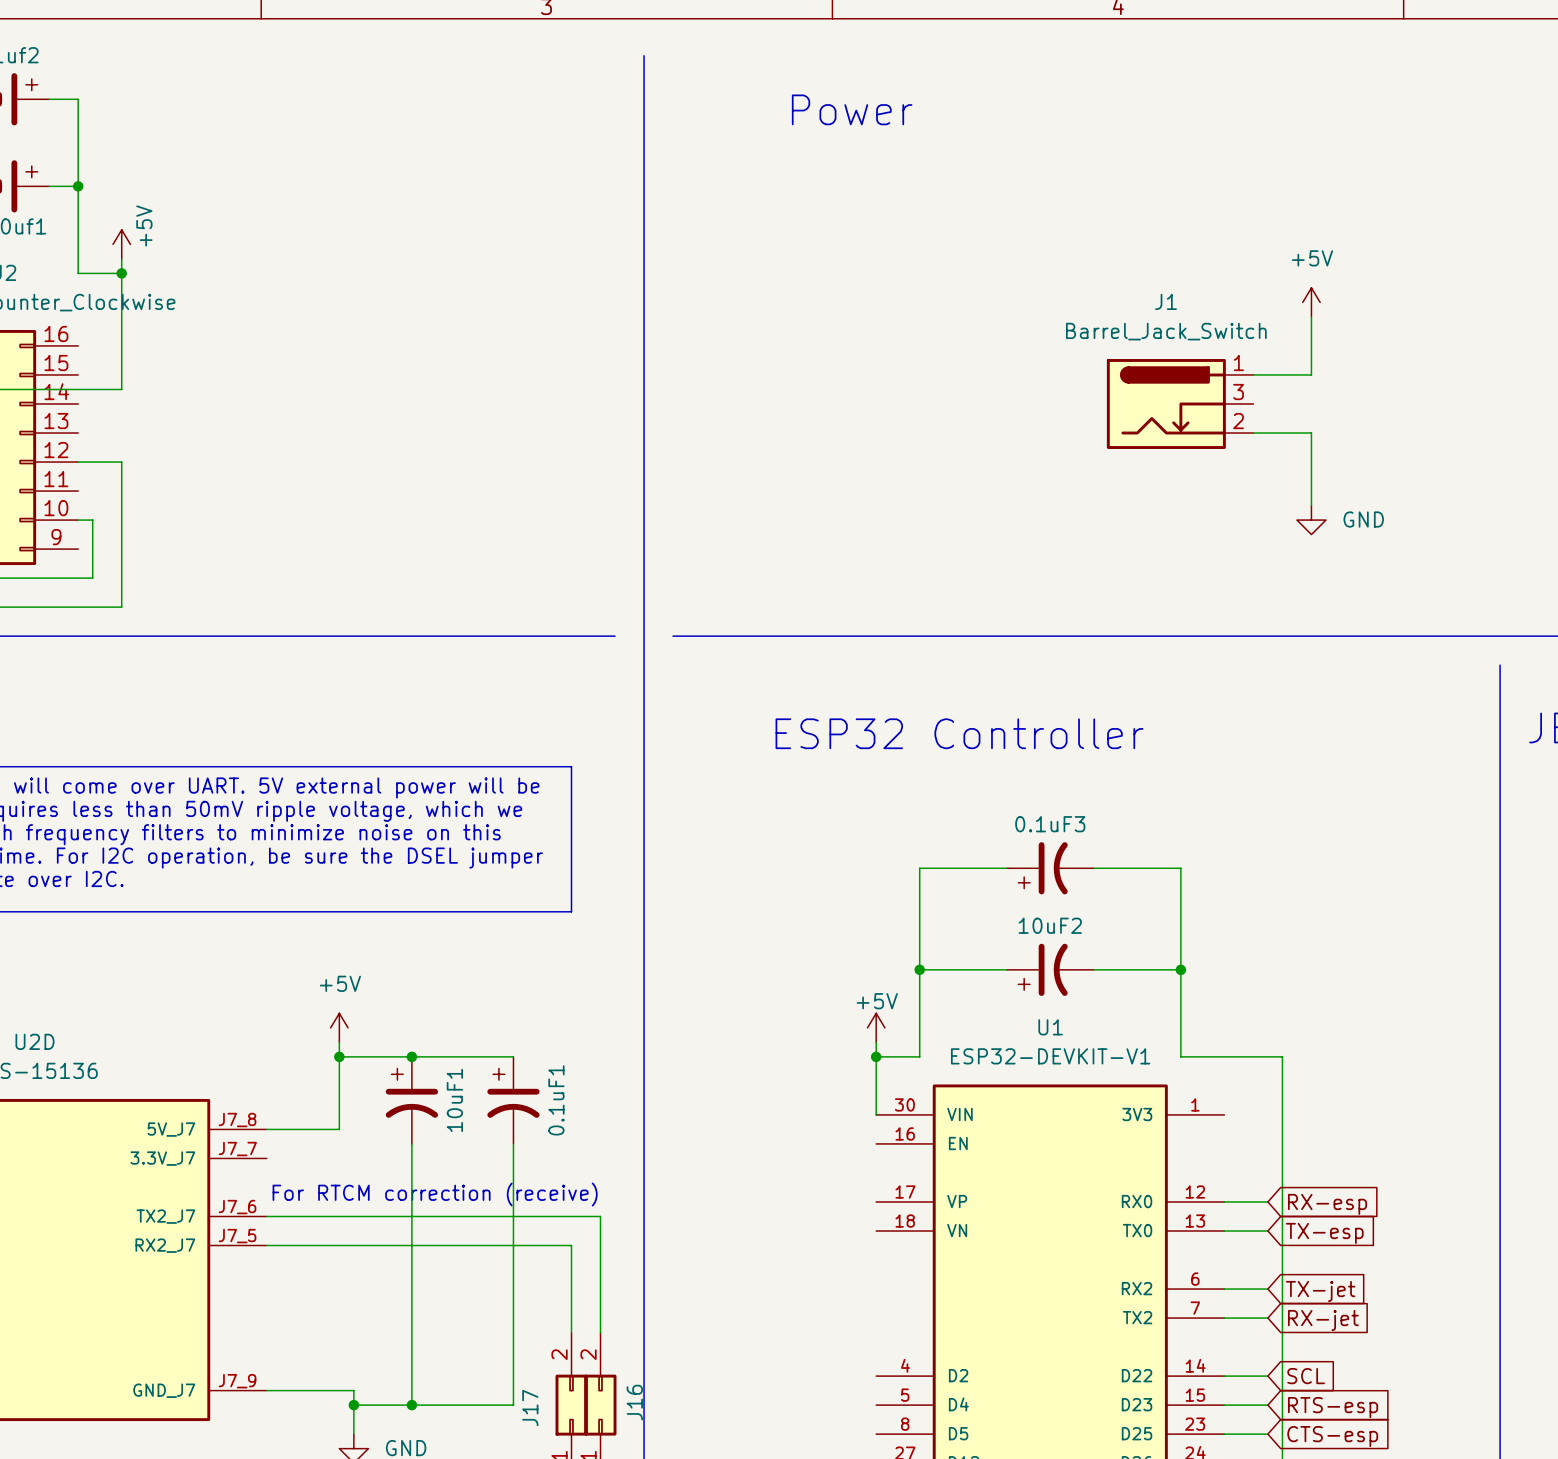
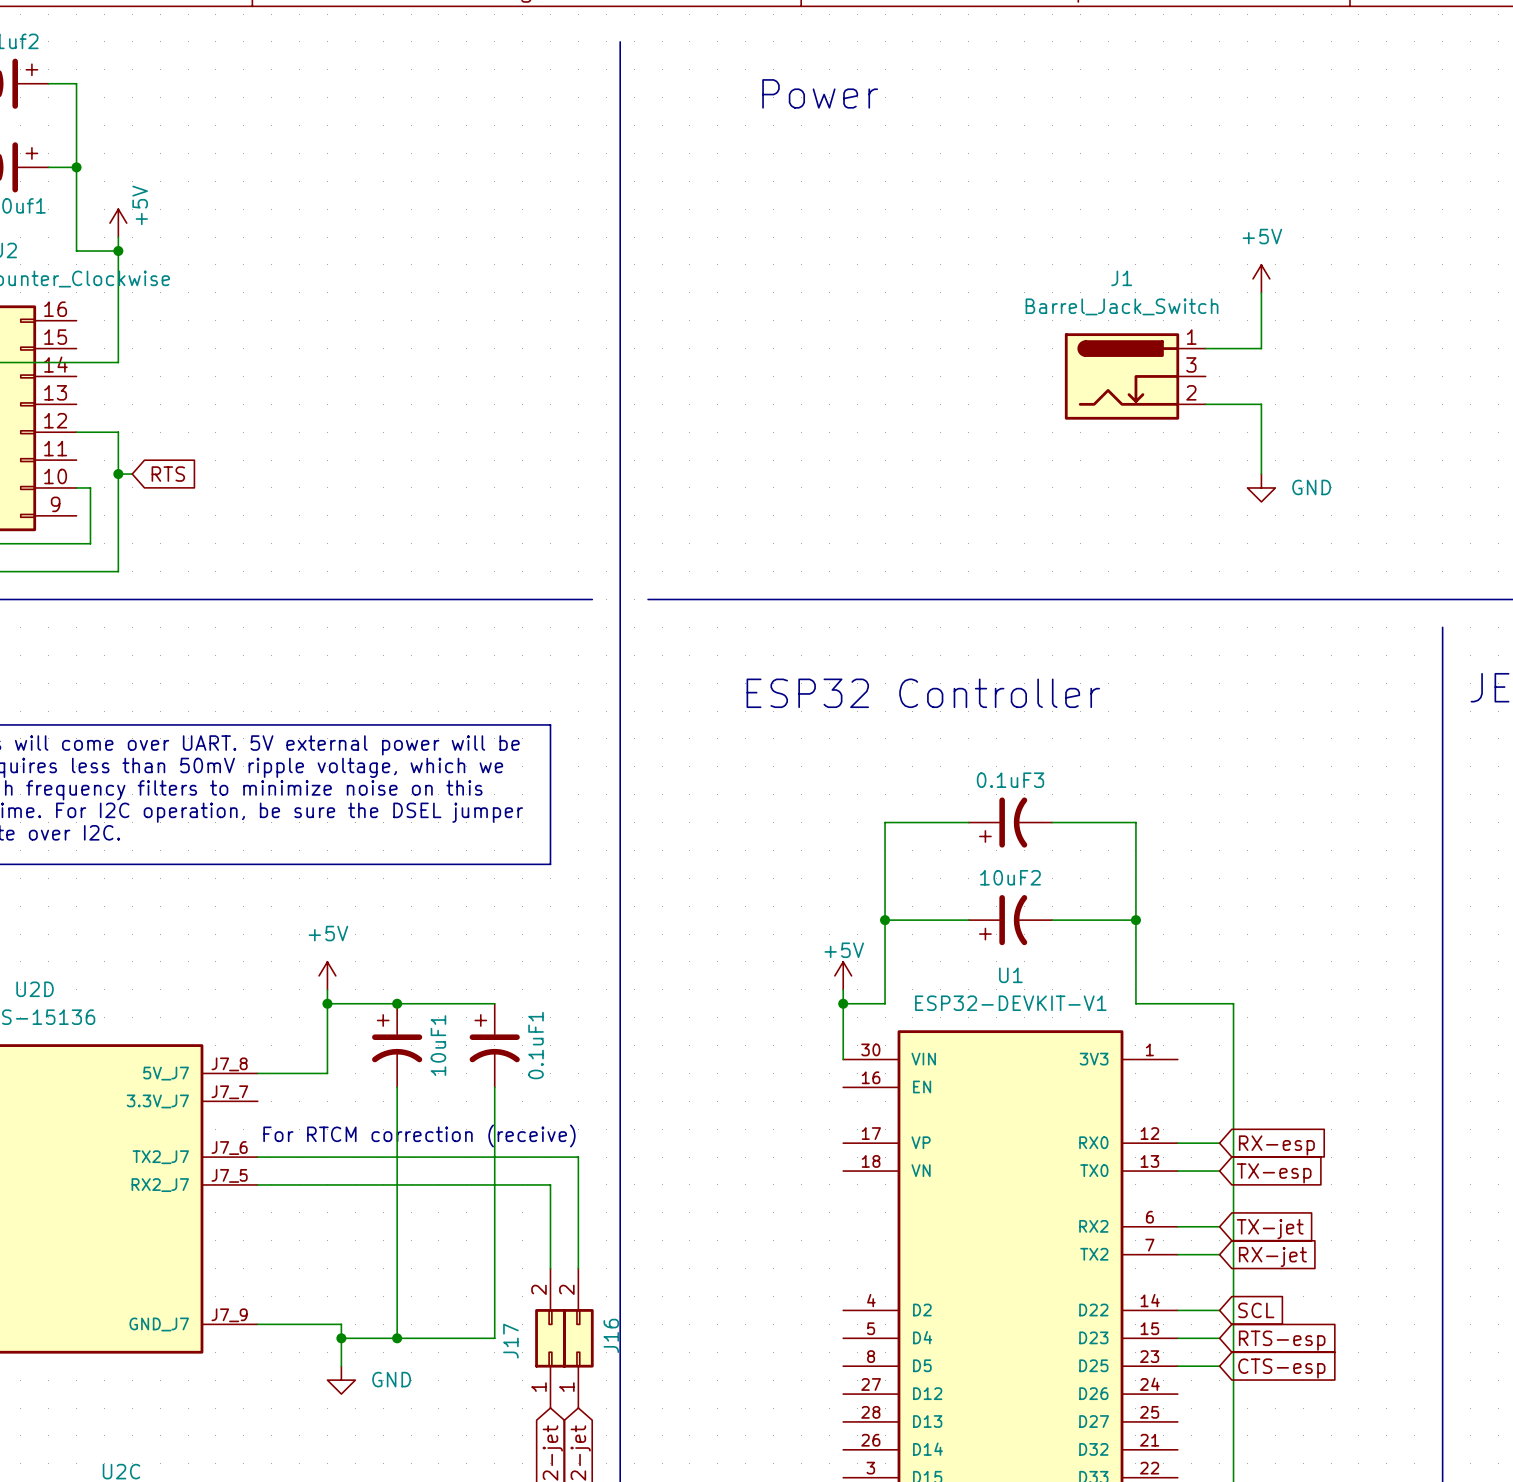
wire: none -> (118, 474) (132, 474)
junction: none -> (118, 474)
global label: none -> RTS (168, 474)

